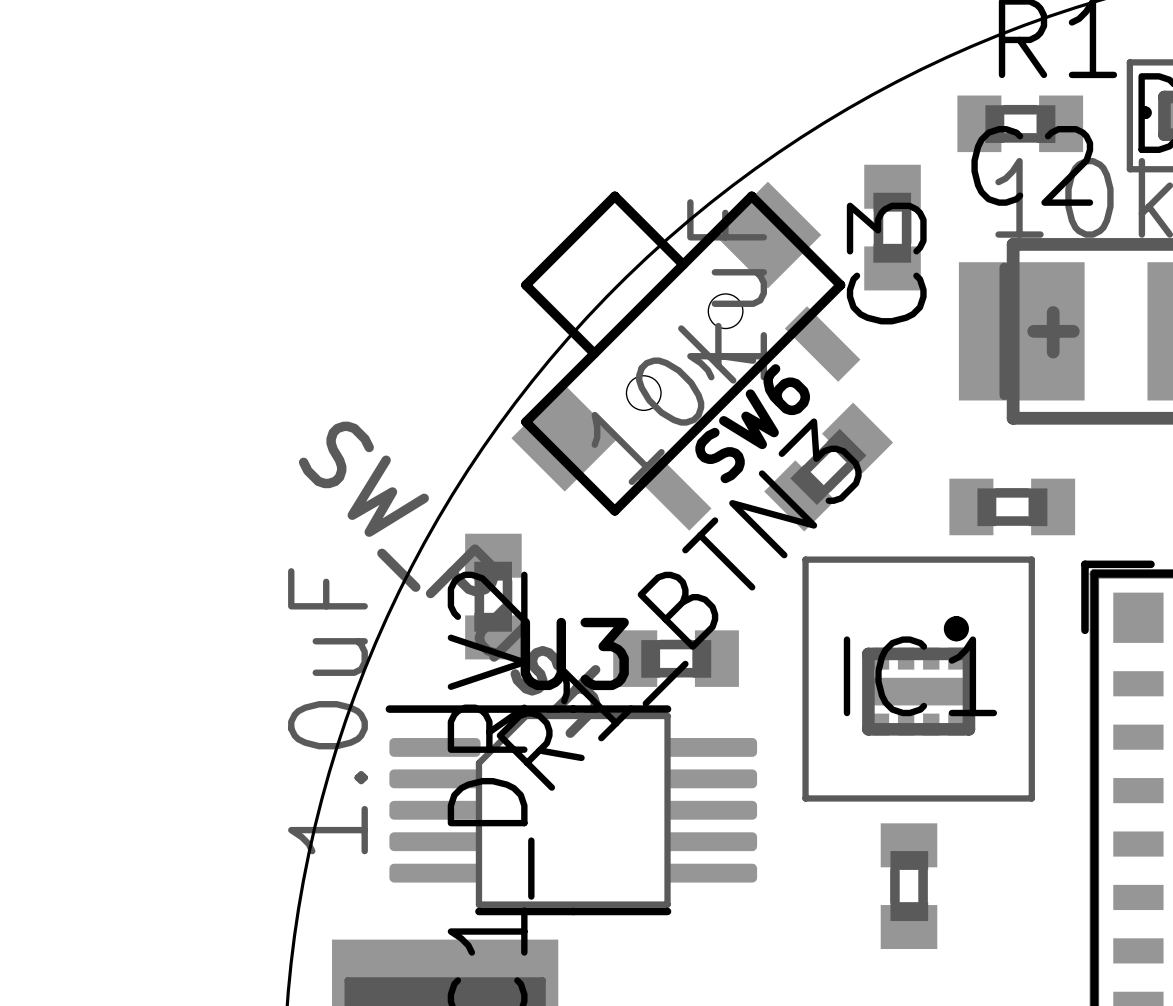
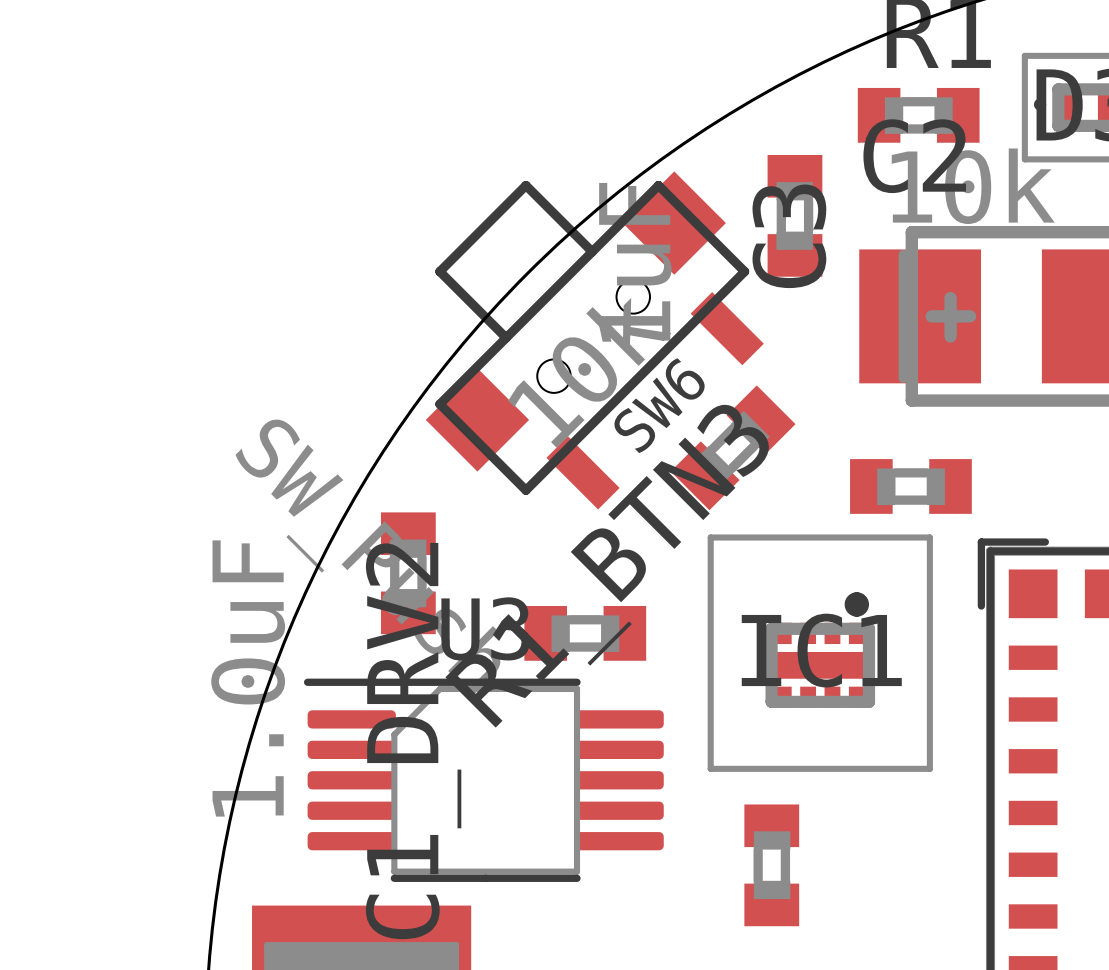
part position: (909, 886) -> (771, 865)

